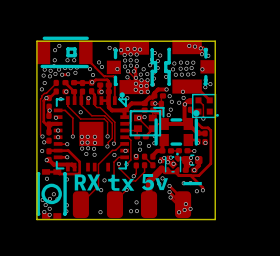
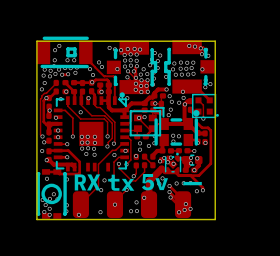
via: none -> (173, 135)
via: none -> (178, 136)
via: none -> (173, 141)
via: none -> (176, 183)
via: none -> (144, 197)
via: none -> (114, 204)
via: none -> (78, 214)

